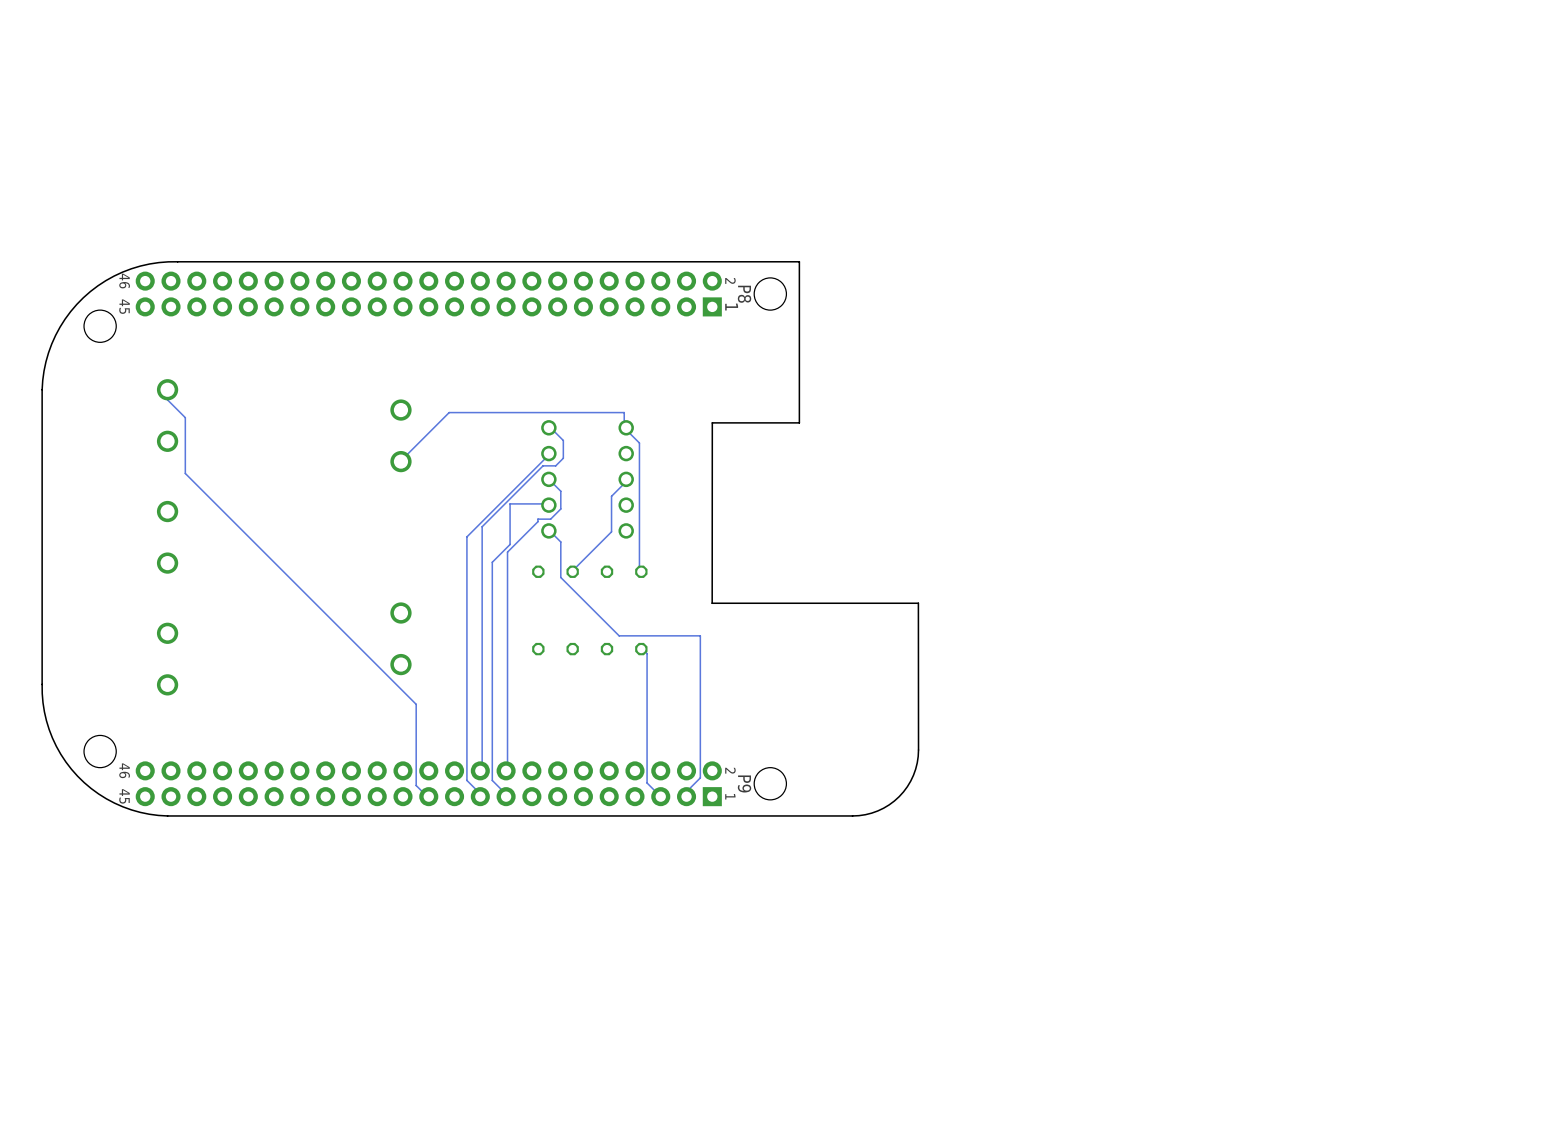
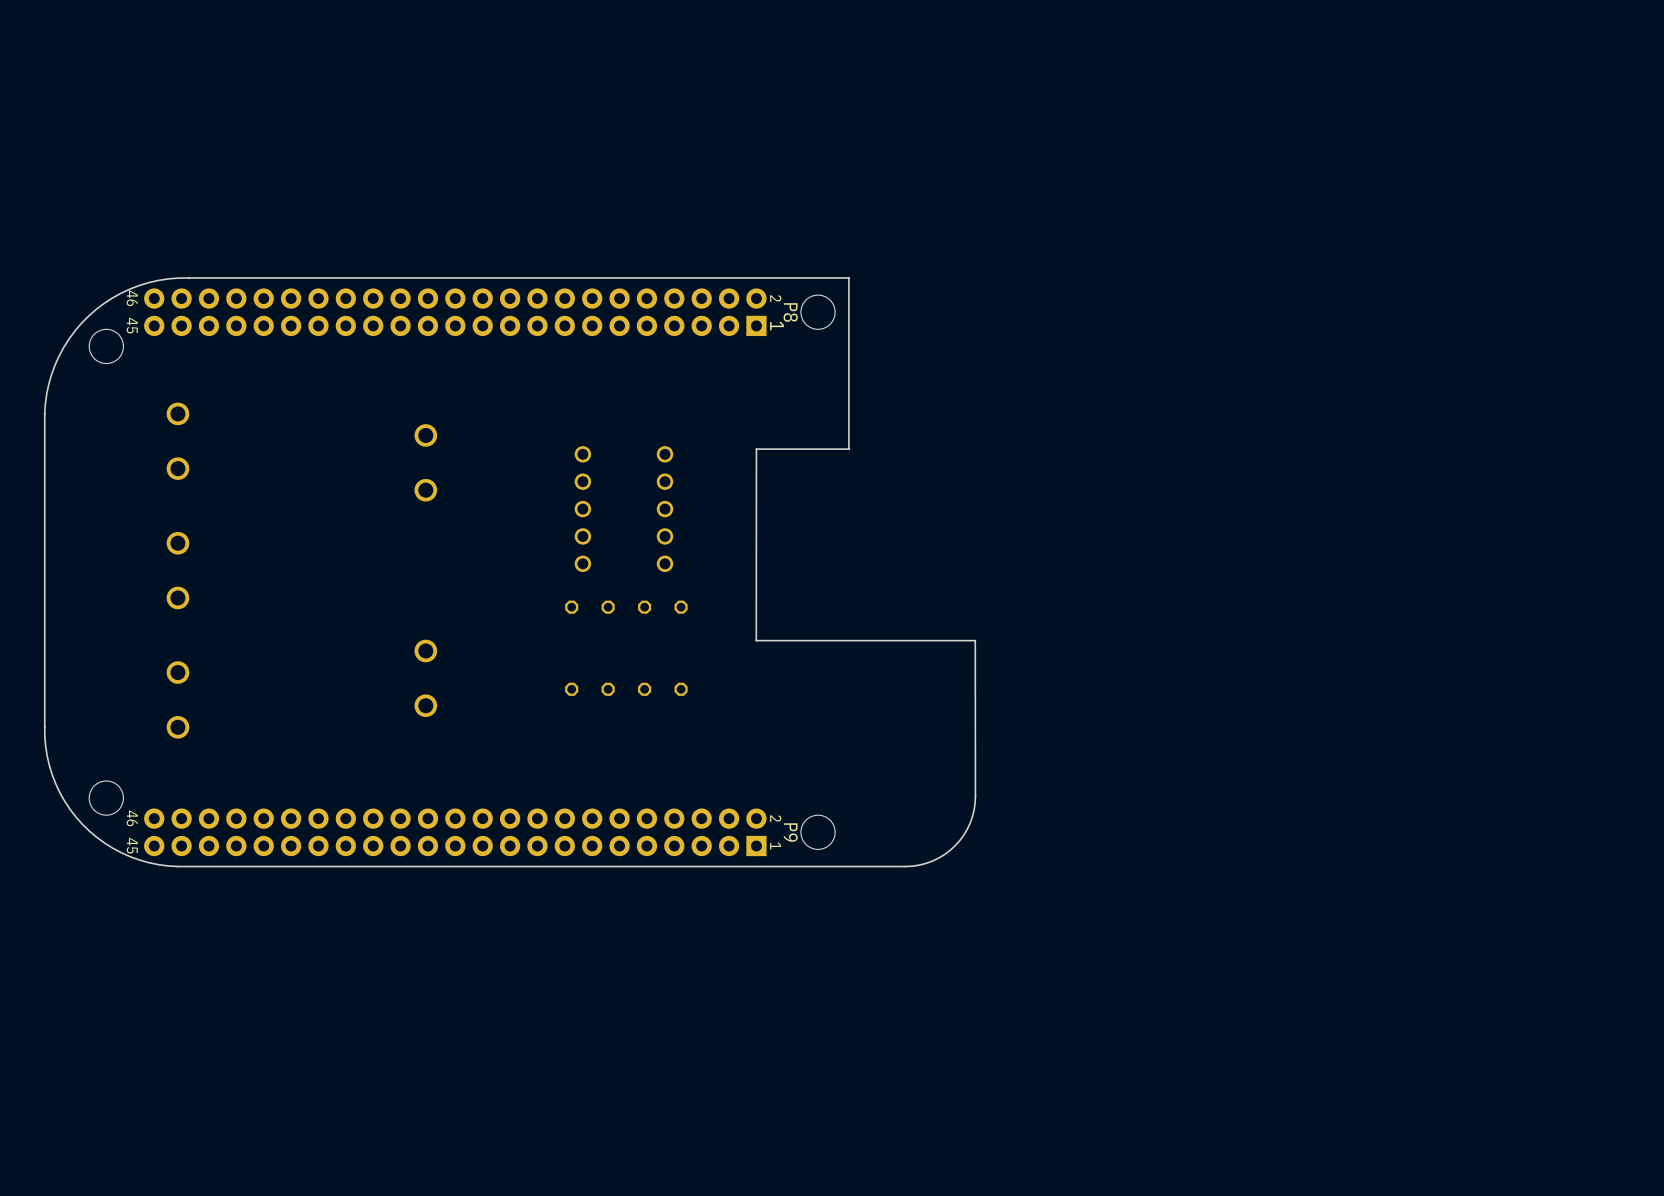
track: (167, 389) (167, 399) (185, 417) (185, 473) (416, 704) (416, 785) (428, 796) -> none
track: (548, 427) (563, 440) (563, 458) (555, 465) (543, 465) (482, 526) (482, 770) (480, 770) -> none
track: (548, 453) (466, 536) (466, 780) (479, 793) (480, 796) -> none
track: (400, 461) (449, 412) (624, 412) (624, 427) (626, 427) (626, 430) (639, 443) (639, 569) (641, 571) -> none
track: (548, 479) (560, 491) (560, 508) (550, 519) (537, 519) (537, 521) (507, 552) (506, 770) -> none
track: (626, 479) (611, 496) (611, 531) (572, 571) -> none
track: (548, 505) (510, 503) (510, 544) (492, 562) (492, 780) (506, 796) -> none
track: (548, 530) (560, 541) (560, 577) (619, 635) (700, 635) (700, 777) (687, 790) (686, 796) -> none
track: (641, 649) (647, 653) (647, 782) (660, 796) -> none

